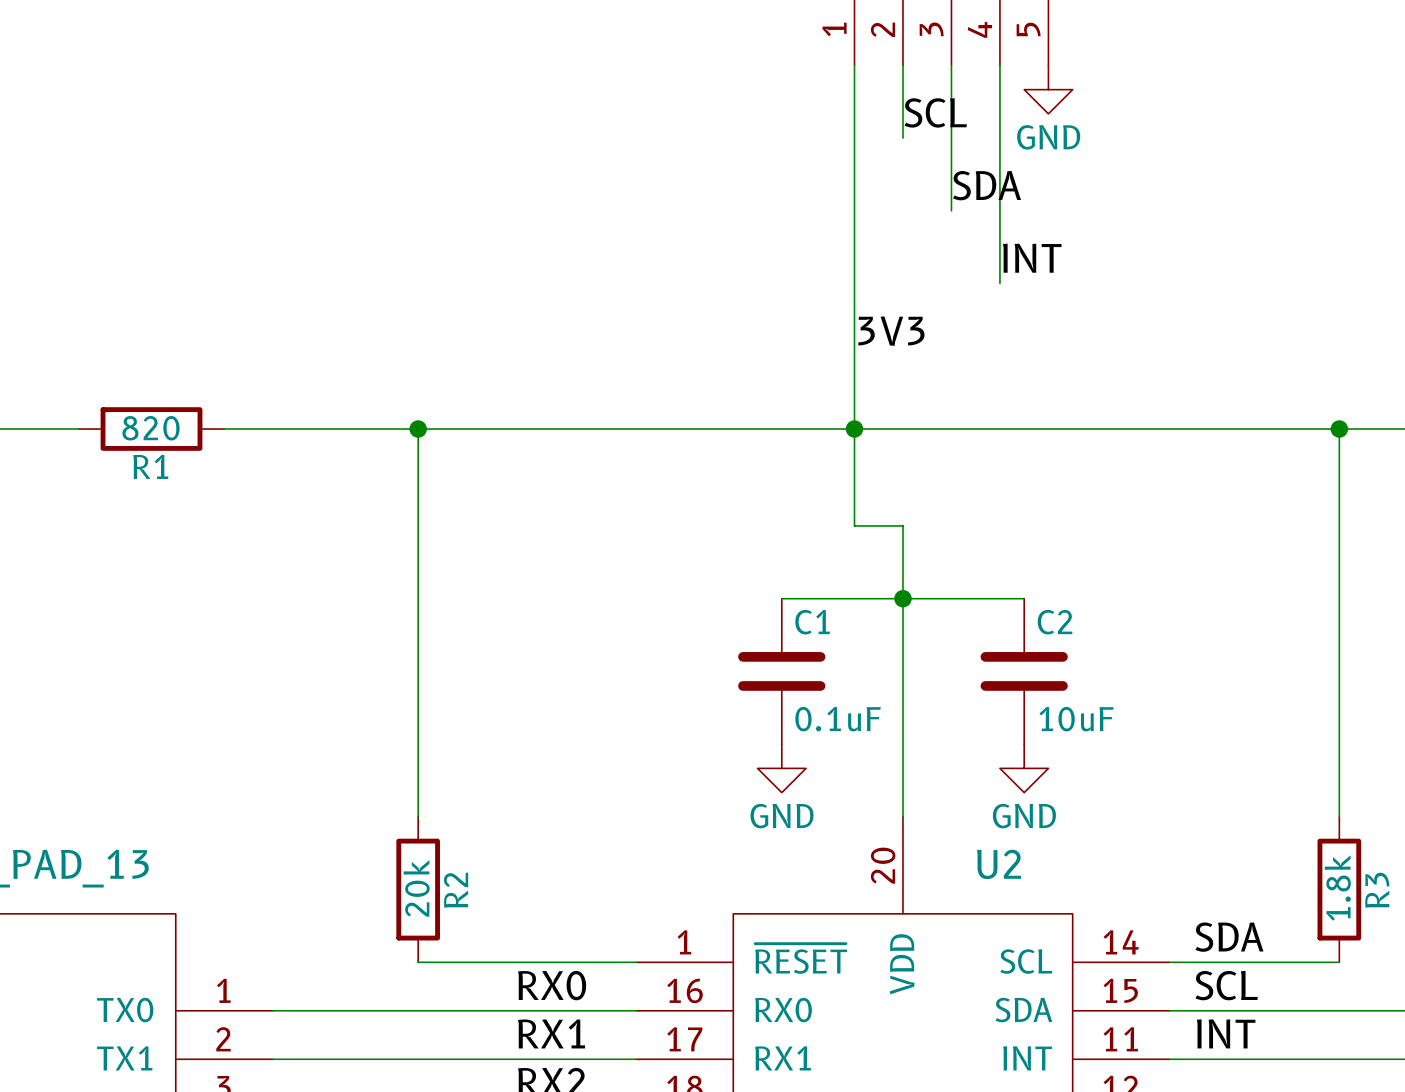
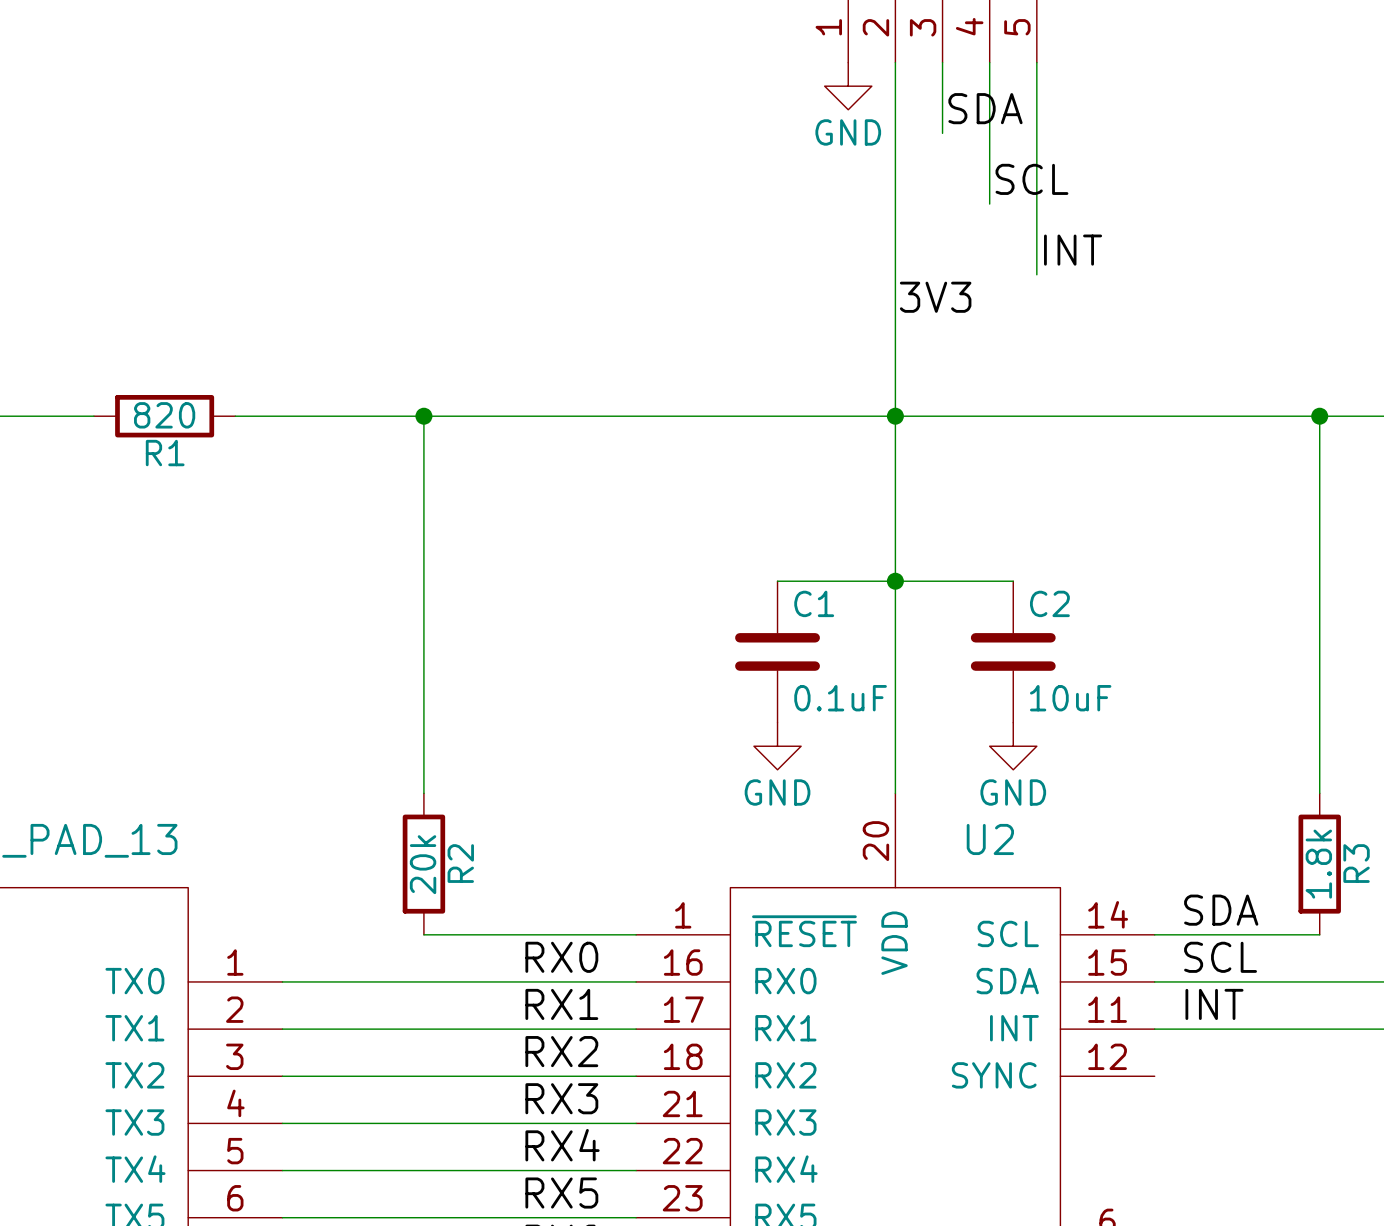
wire: (854, 65) (854, 525) (902, 525) -> (895, 133) (895, 510)
wire: none -> (1036, 62) (1036, 274)
power symbol position: GND (1048, 89) -> GND (848, 86)
label position: SCL (935, 112) -> SCL (1031, 179)
wire: (951, 138) (951, 210) -> none
label position: SDA (987, 185) -> SDA (985, 108)
wire: (999, 210) (999, 283) -> none
label position: INT (1032, 258) -> INT (1073, 250)
label position: 3V3 (891, 331) -> 3V3 (935, 297)
junction position: (854, 429) -> (895, 416)

